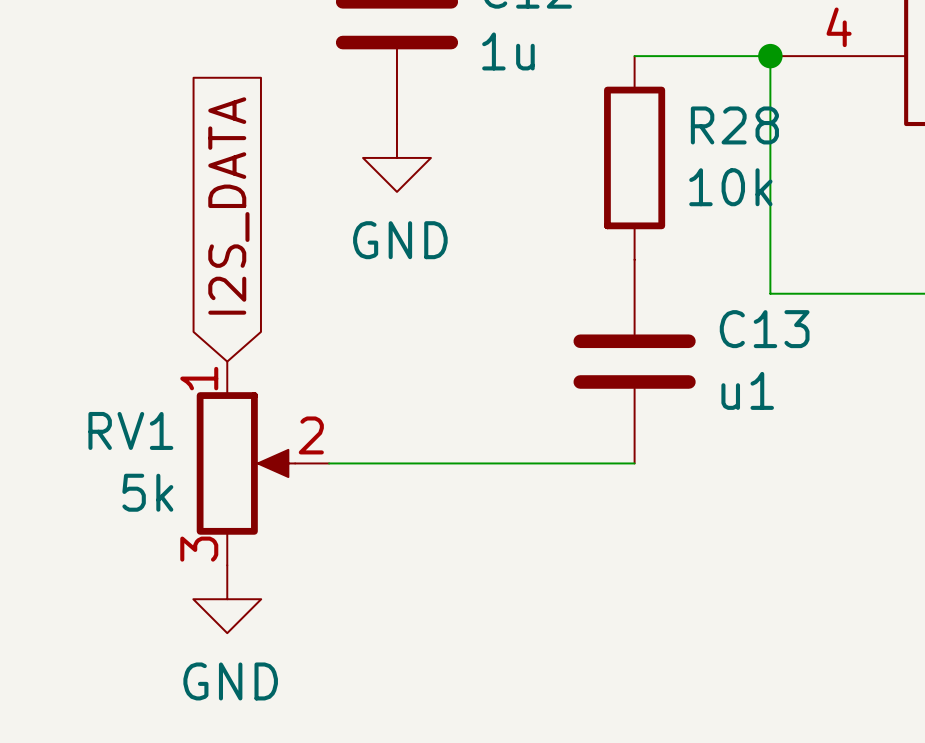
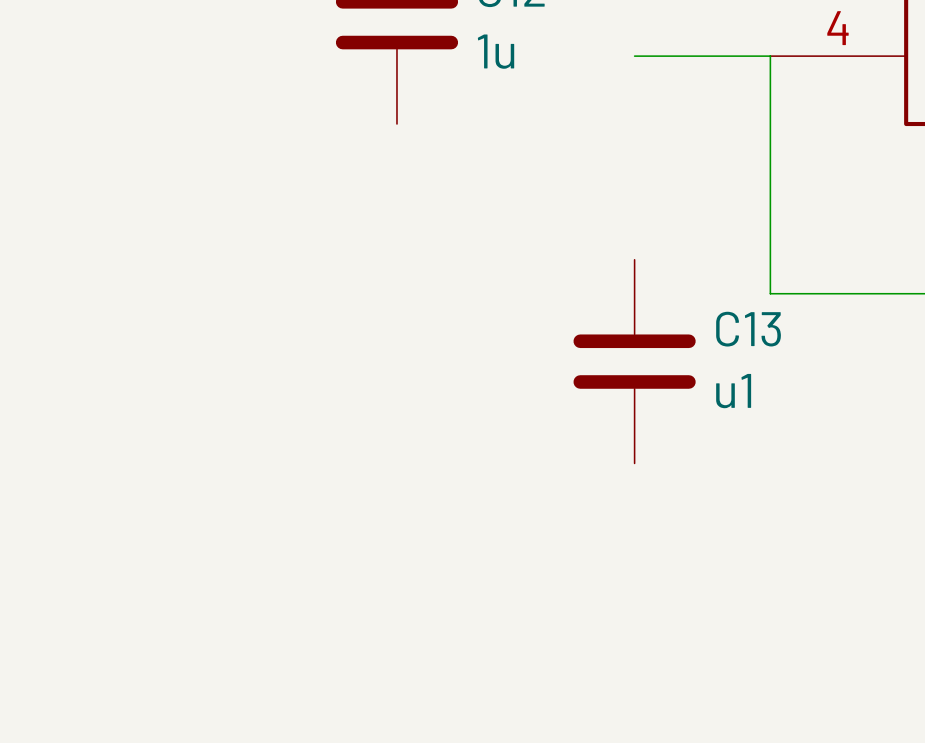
junction: (770, 56) -> none
power symbol: GND (396, 157) -> none
R28: 10k (634, 157) -> none
global label: I2S_DATA (228, 205) -> none
RV1: 5k (262, 463) -> none
wire: (329, 463) (634, 463) -> none
power symbol: GND (227, 599) -> none

